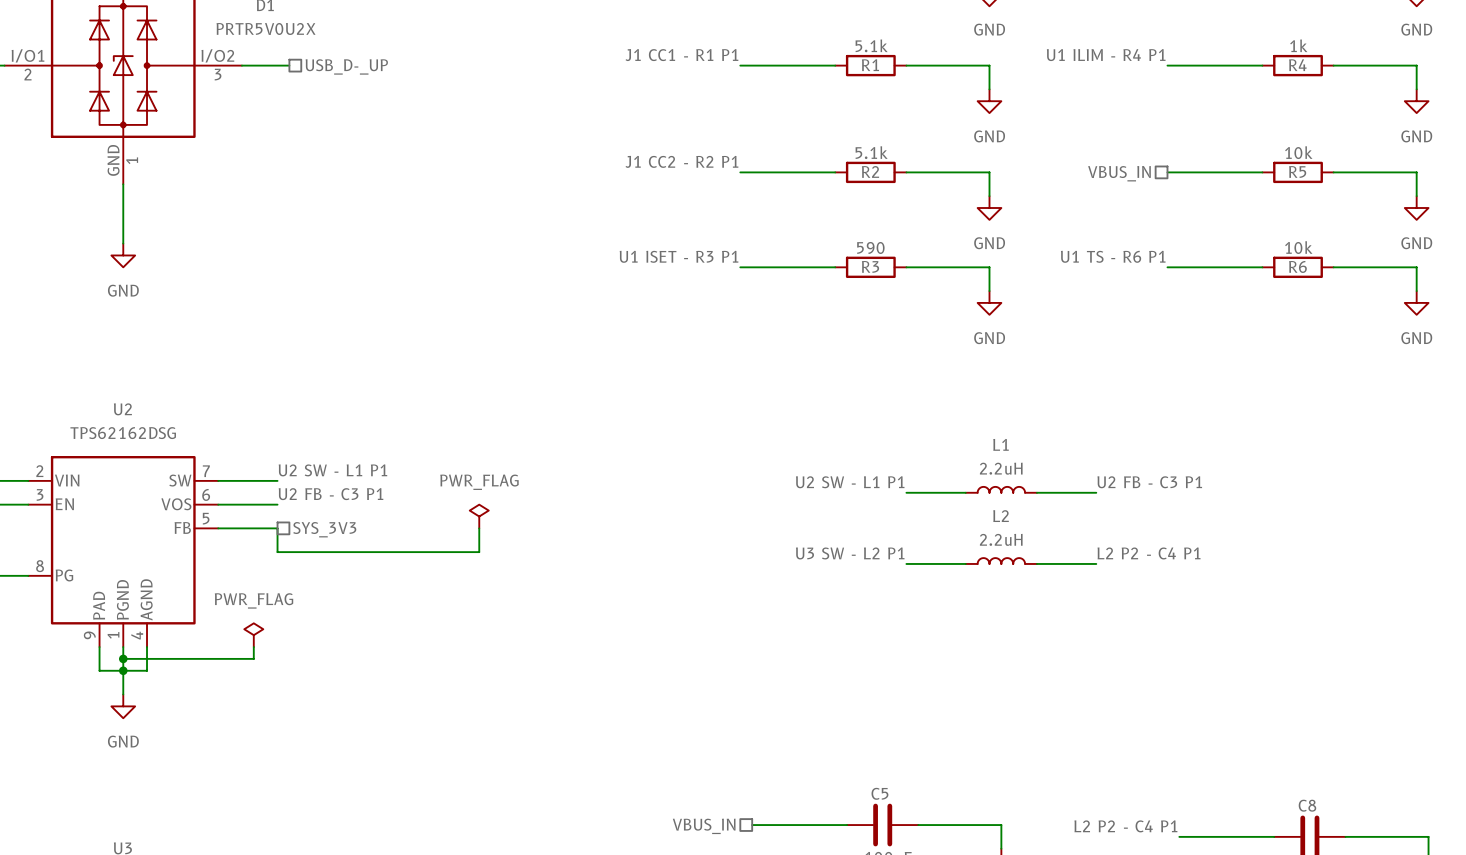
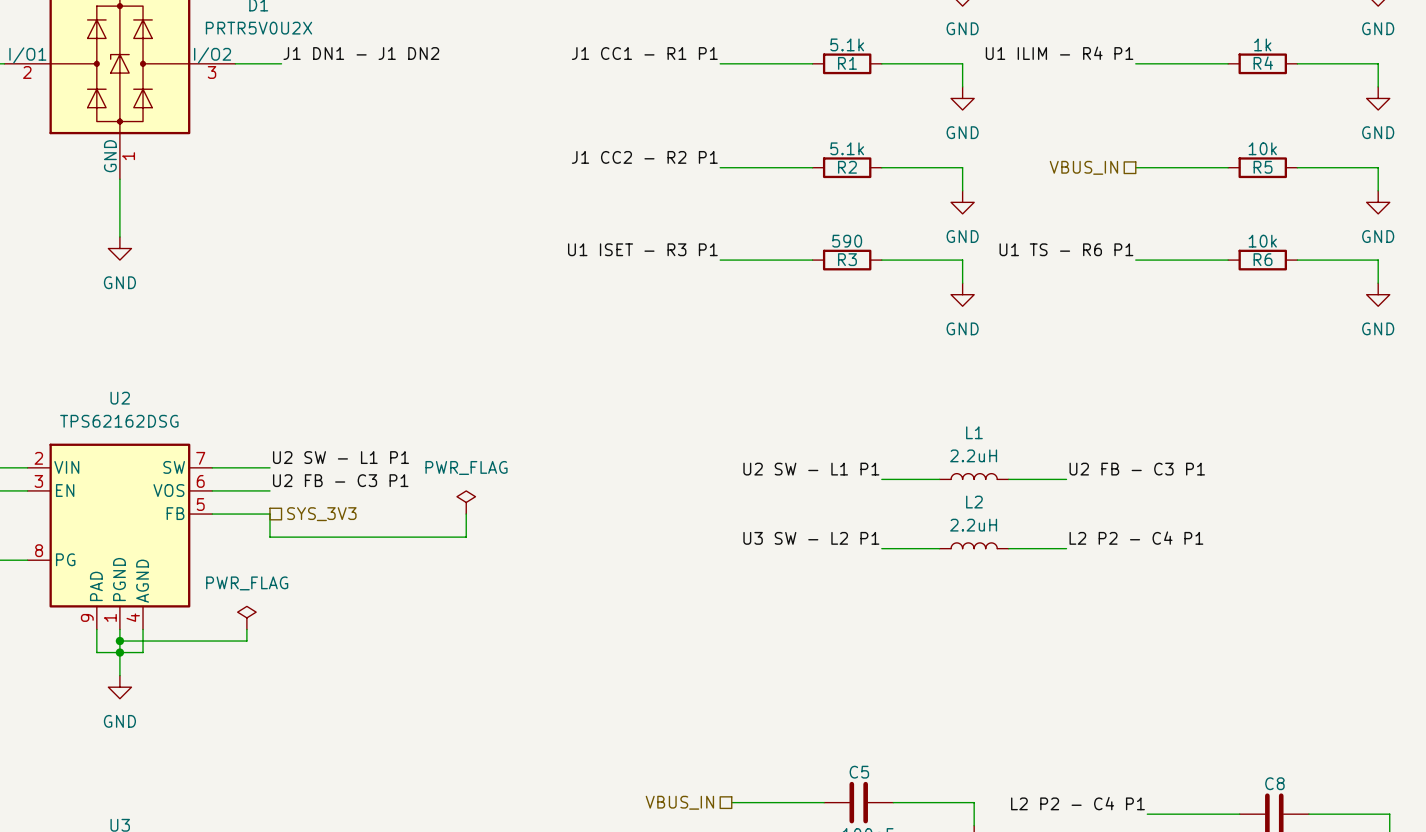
label: none -> J1 DN1 - J1 DN2 (361, 53)
hierarchical label: USB_D-_UP (346, 66) -> none

